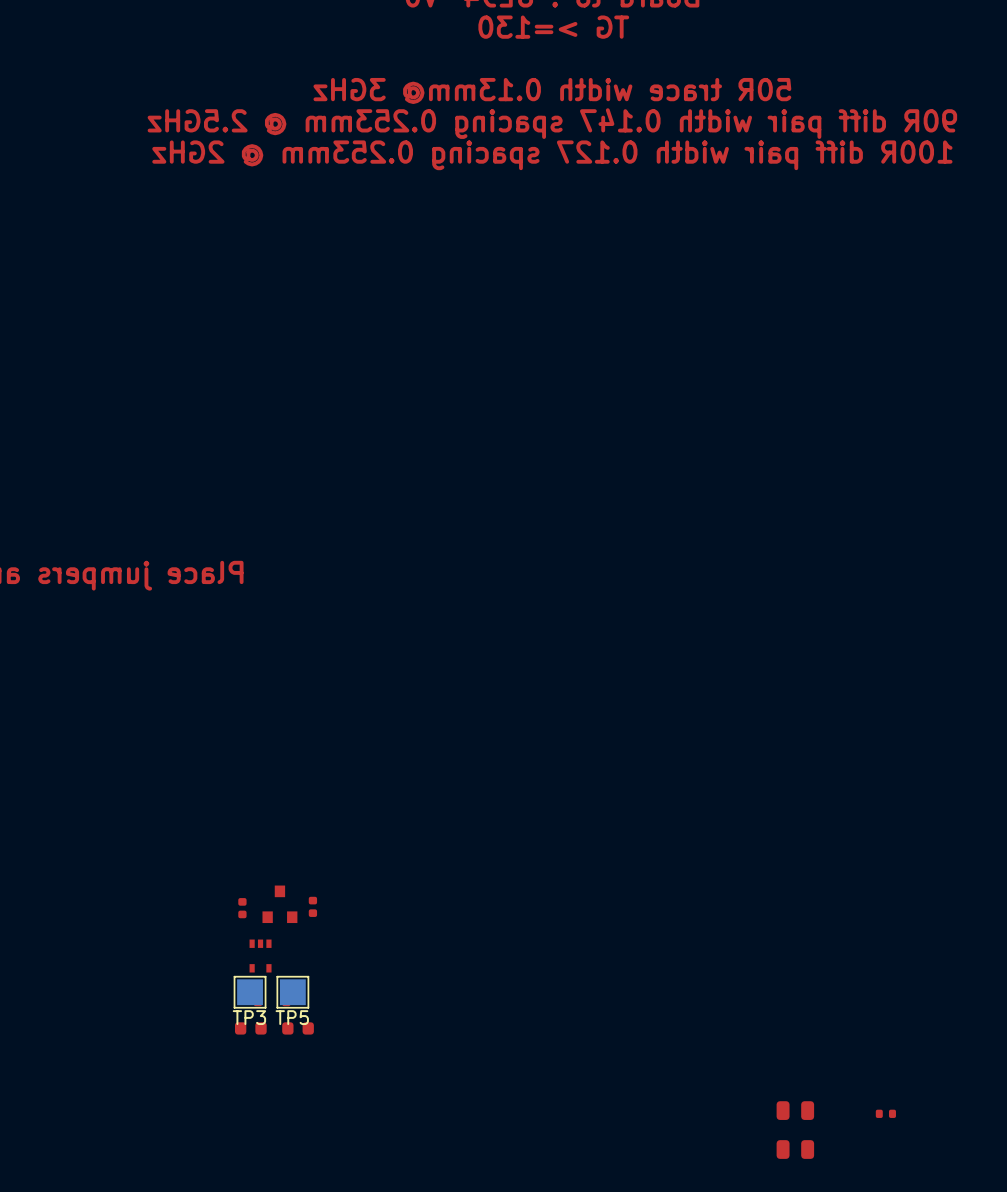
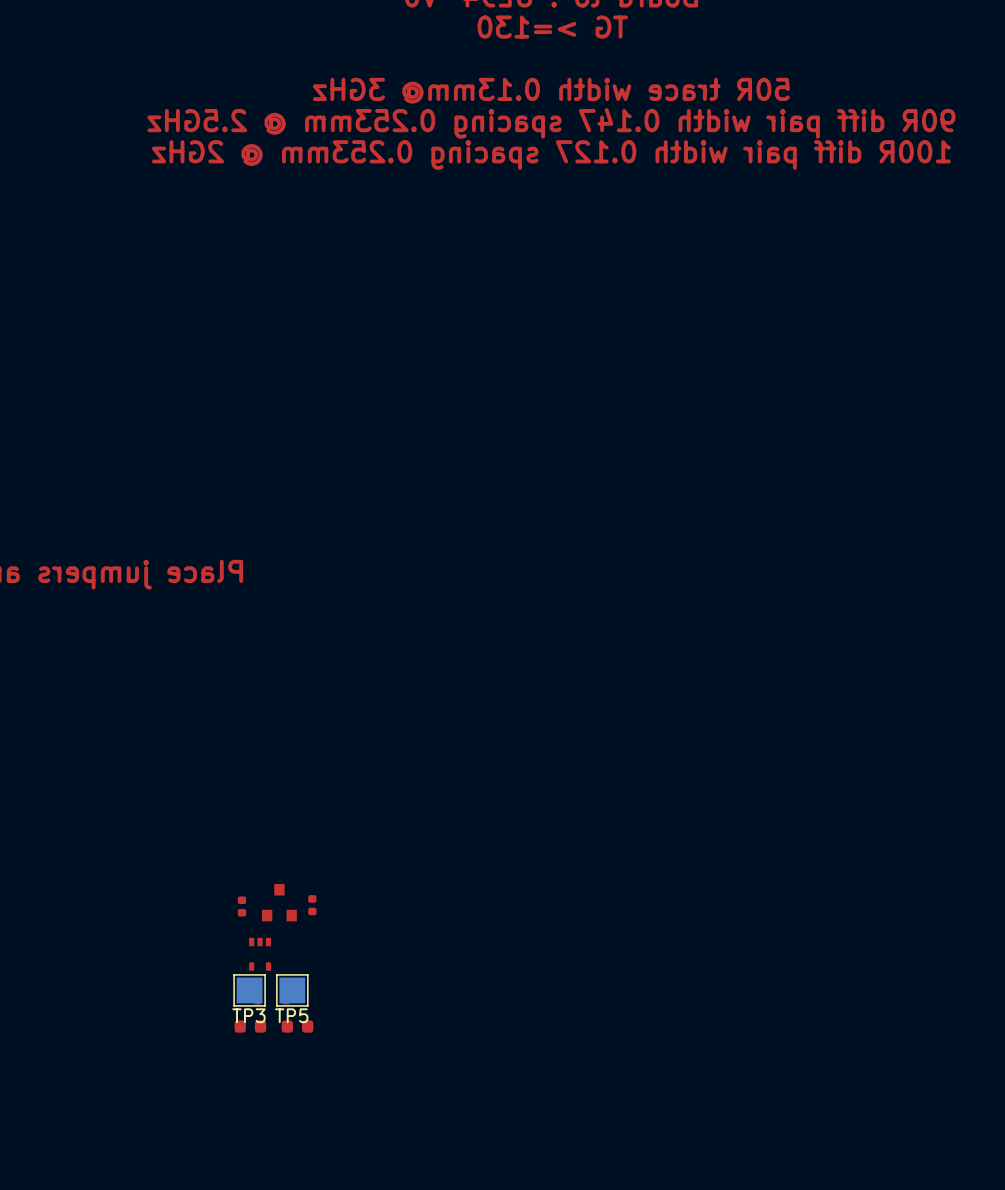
part: (795, 1110) -> none
part: (885, 1113) -> none
part: (795, 1149) -> none

